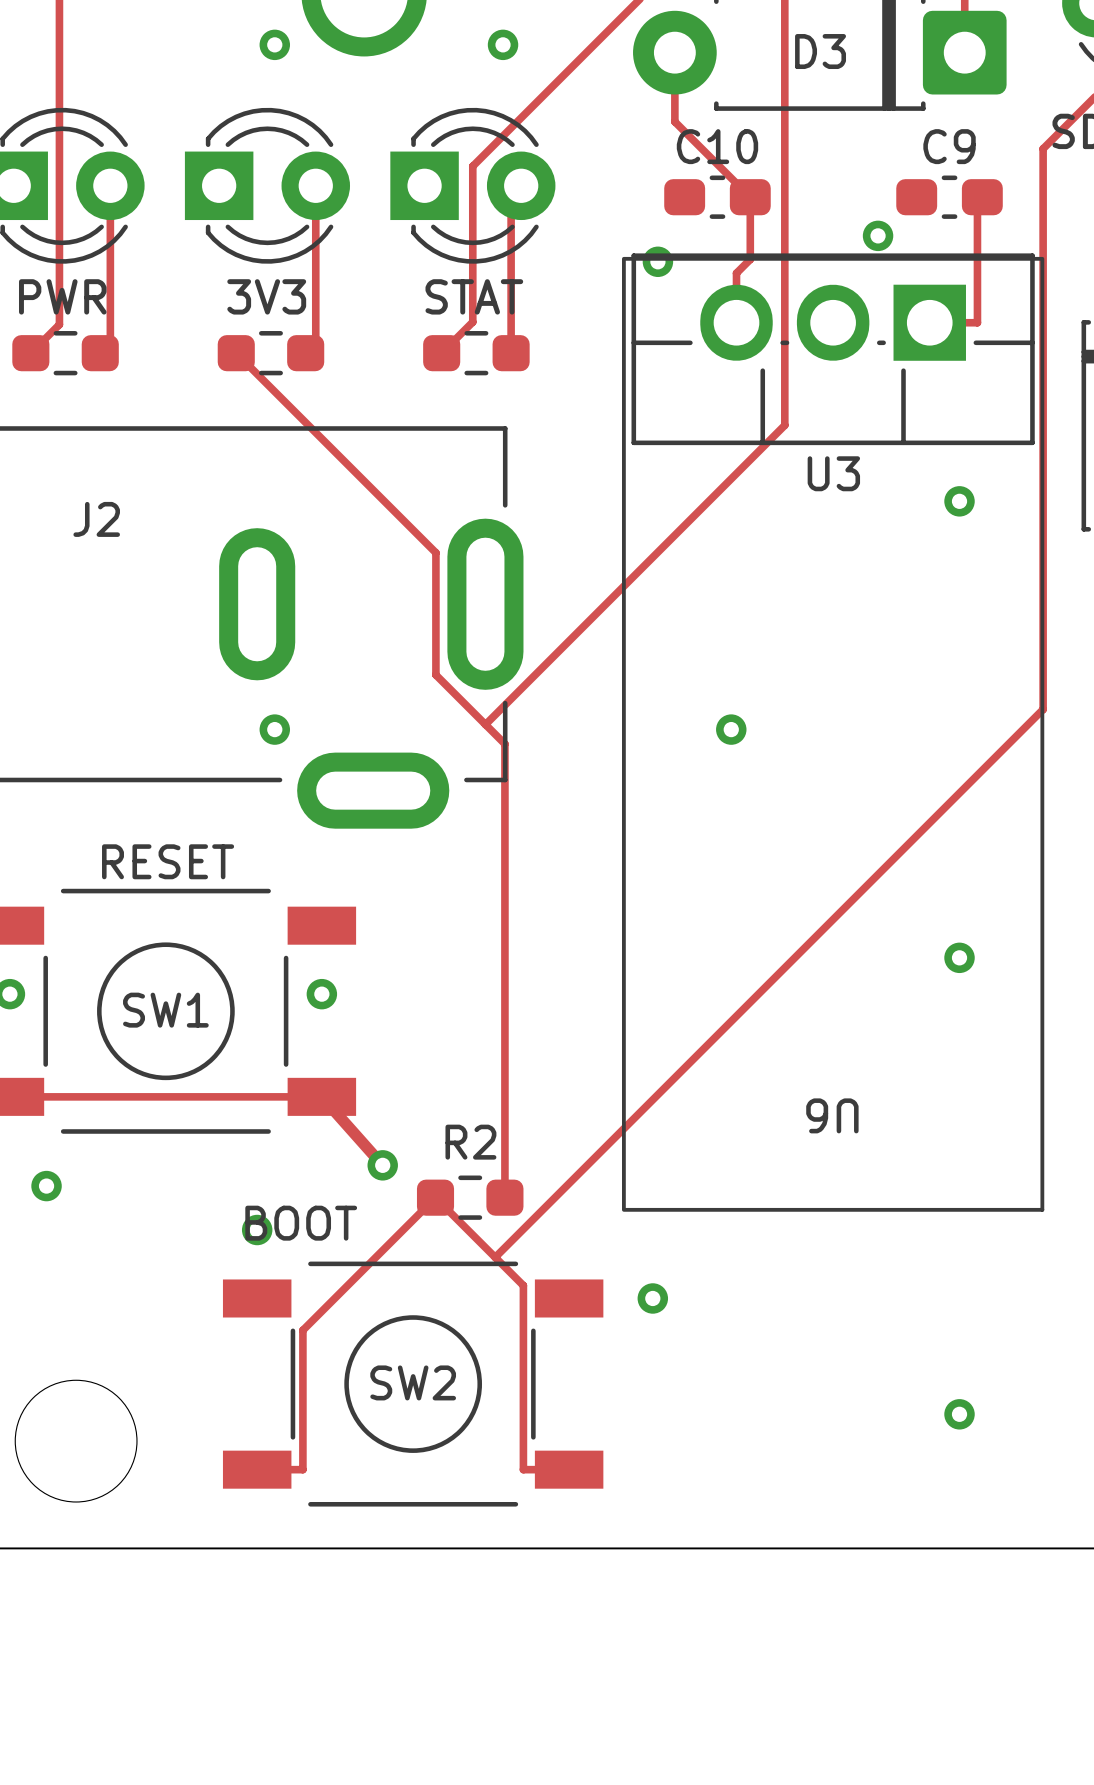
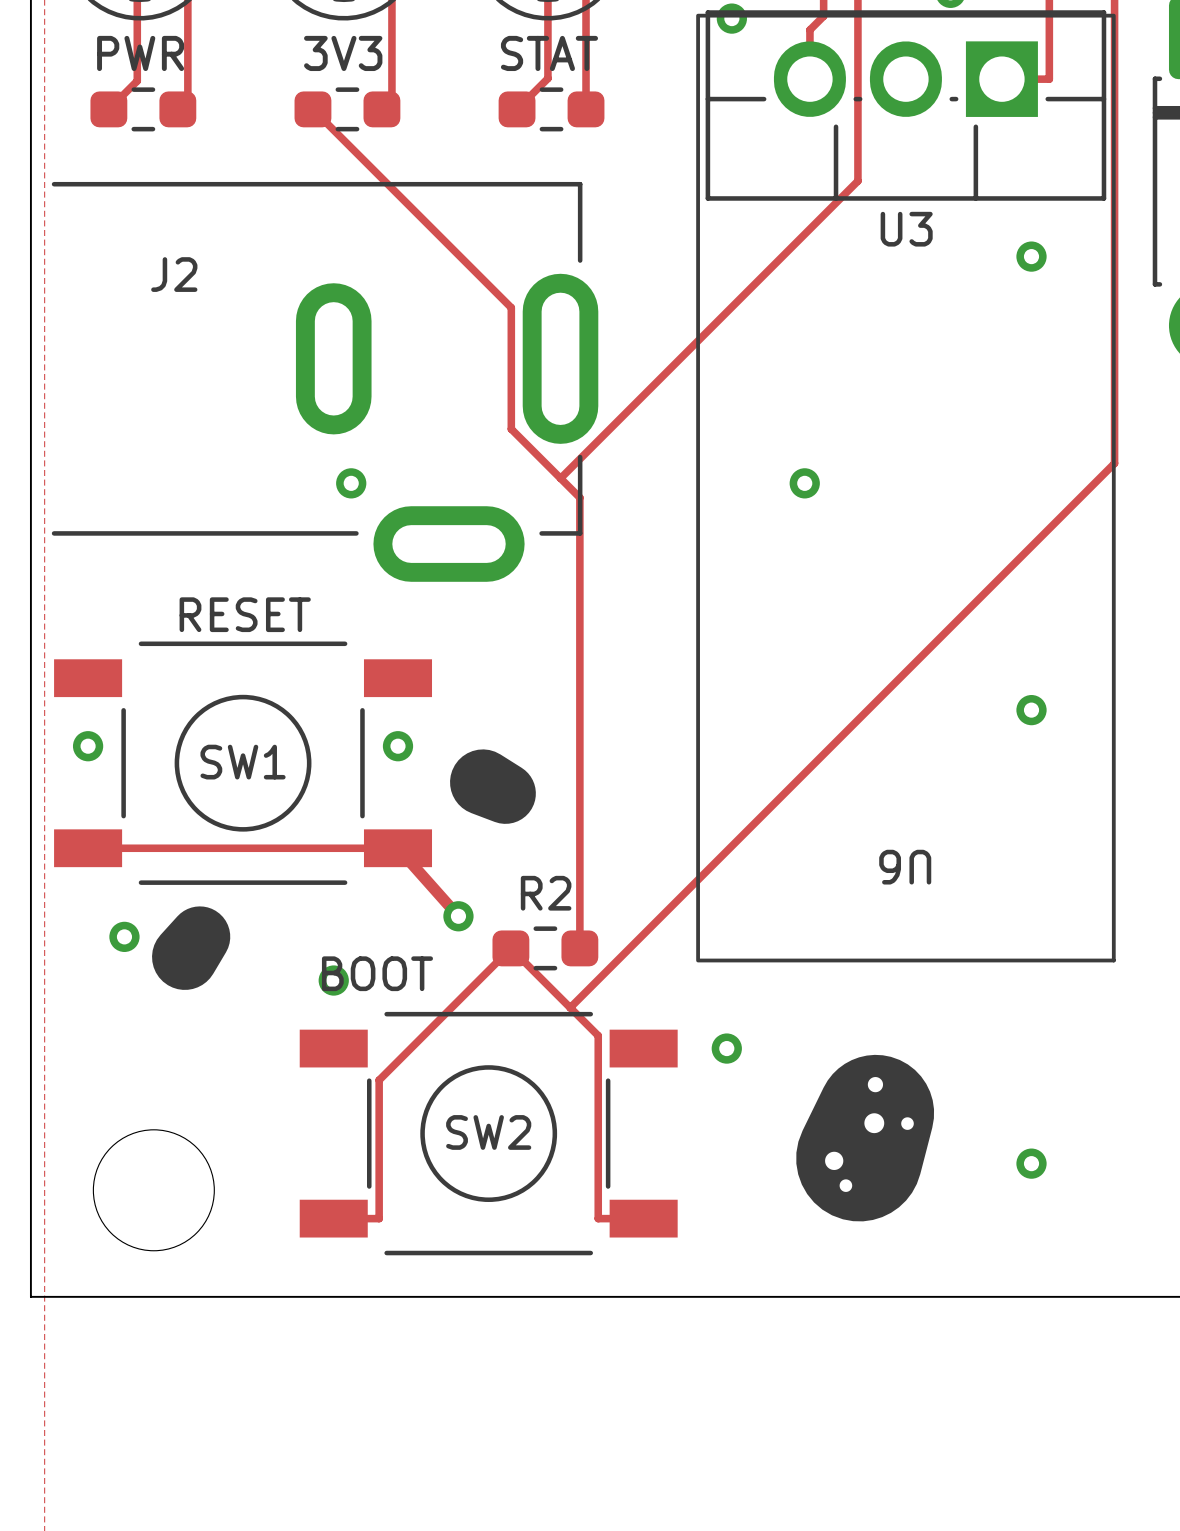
drawing: none -> [450, 749, 536, 824]
drawing: none -> [152, 906, 231, 990]
drawing: none -> [796, 1054, 935, 1222]

